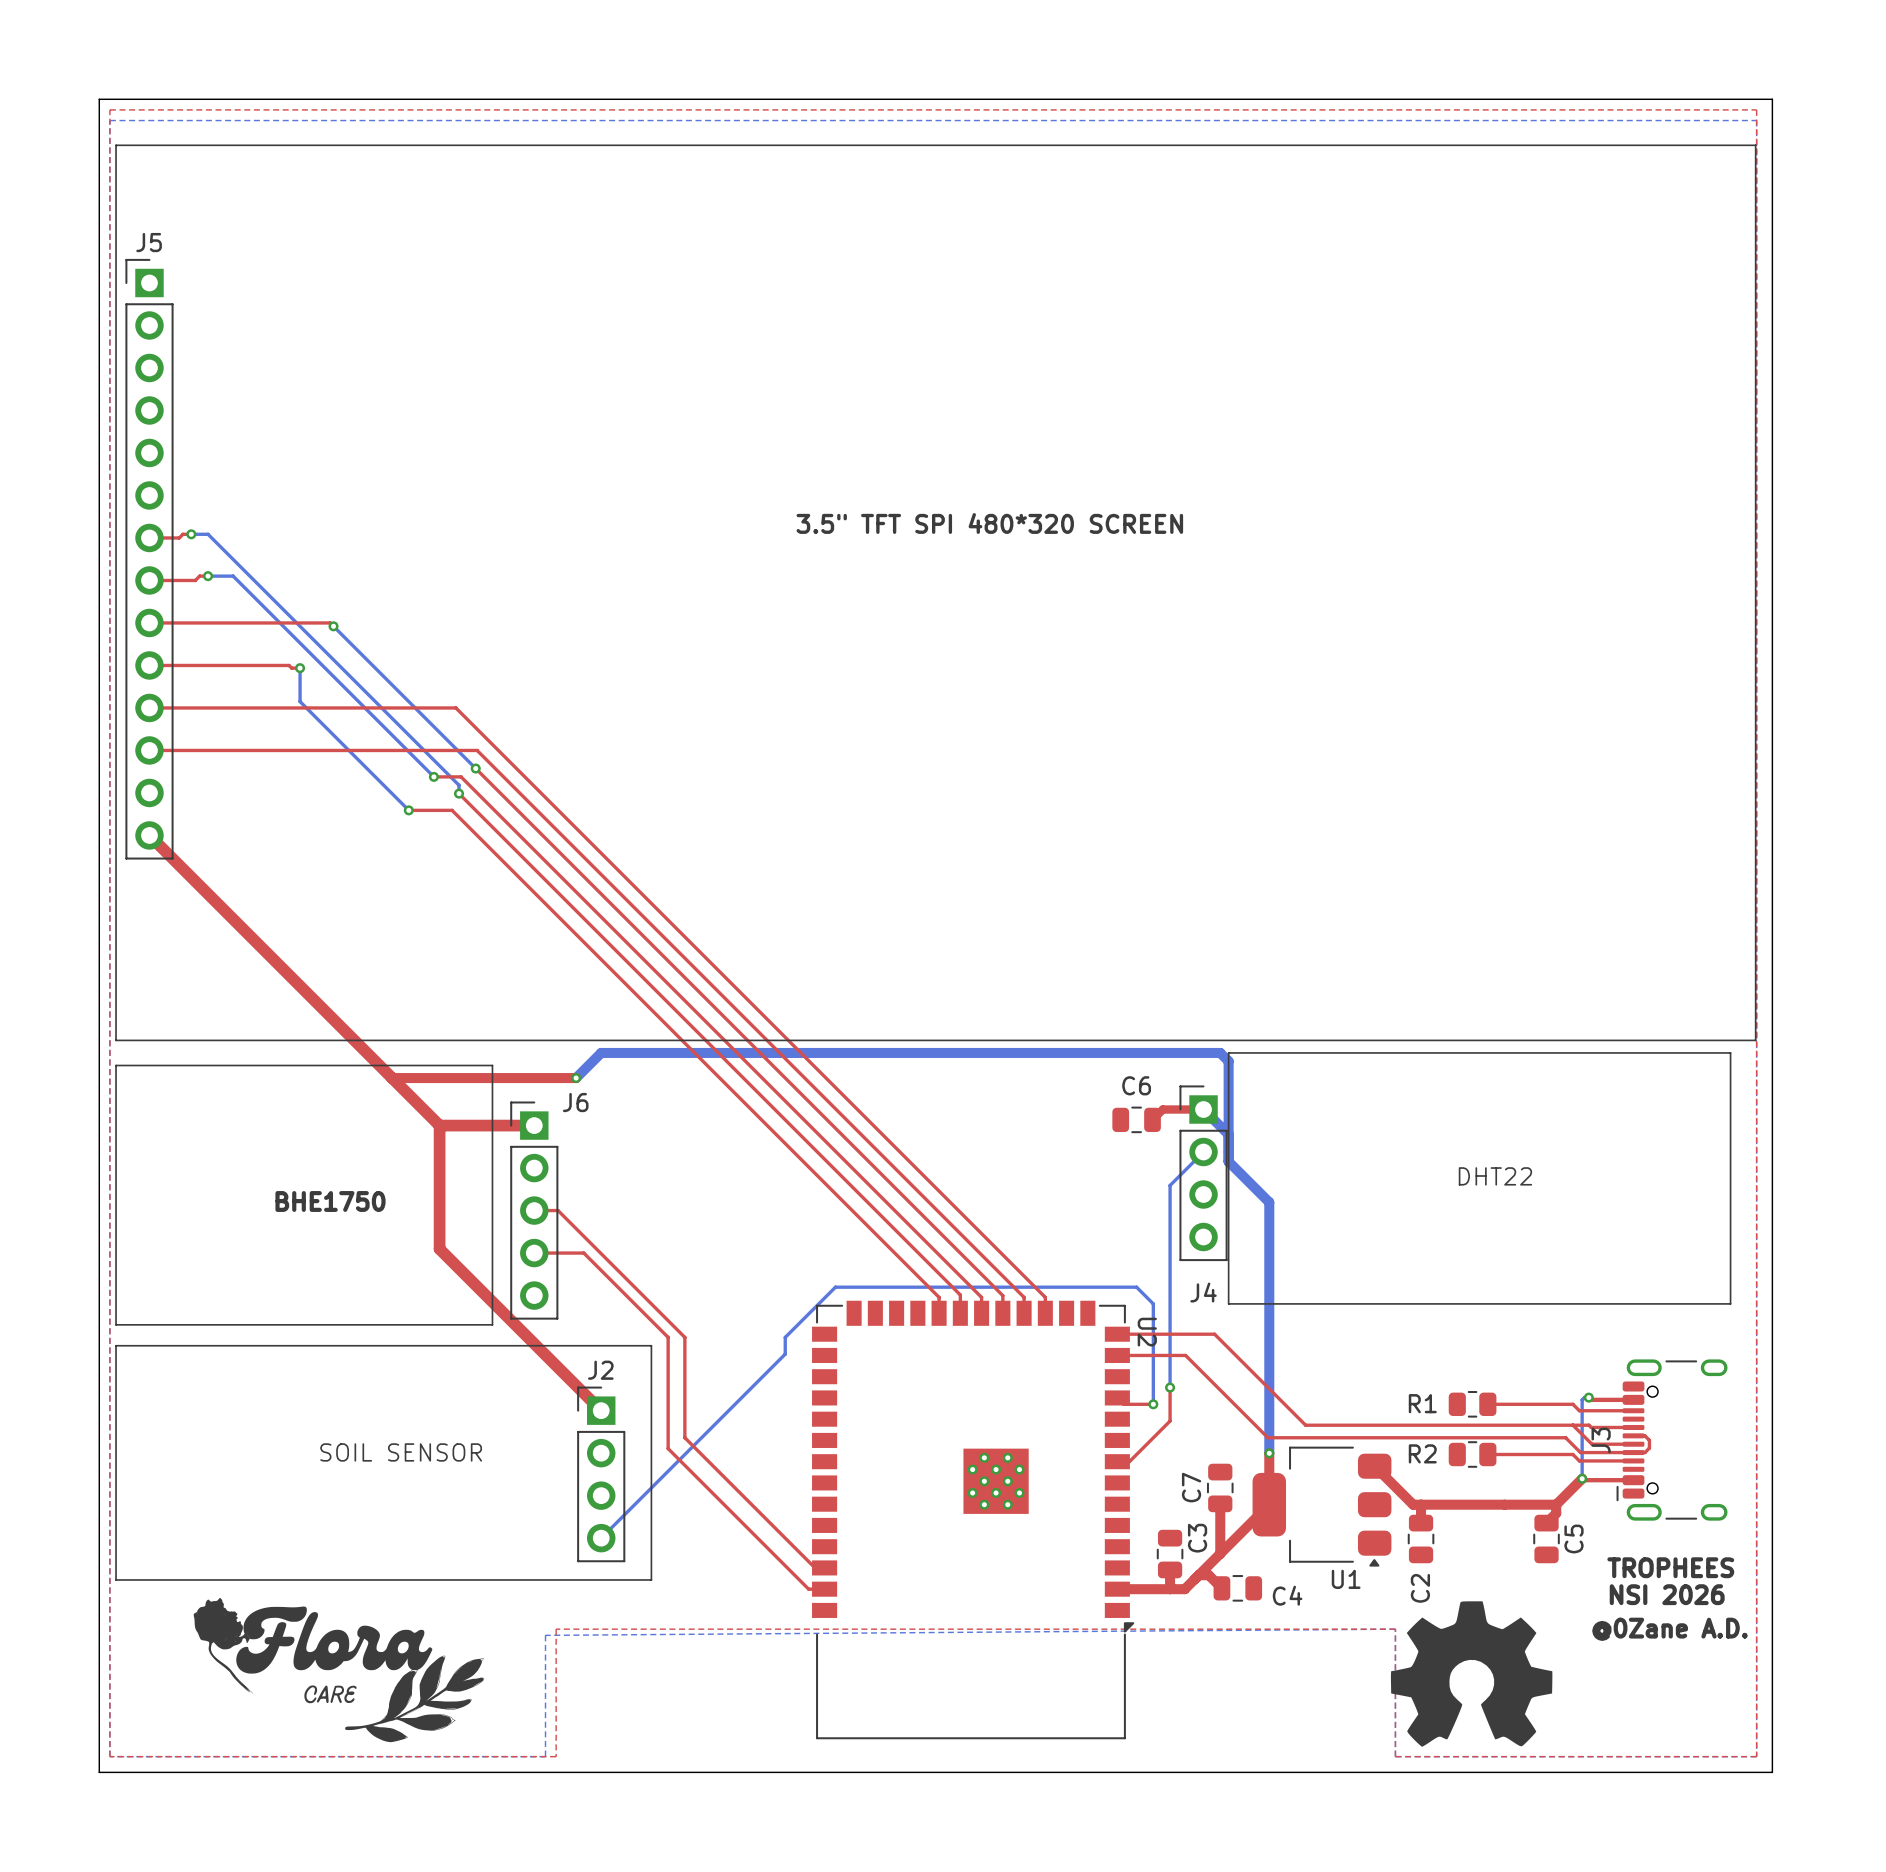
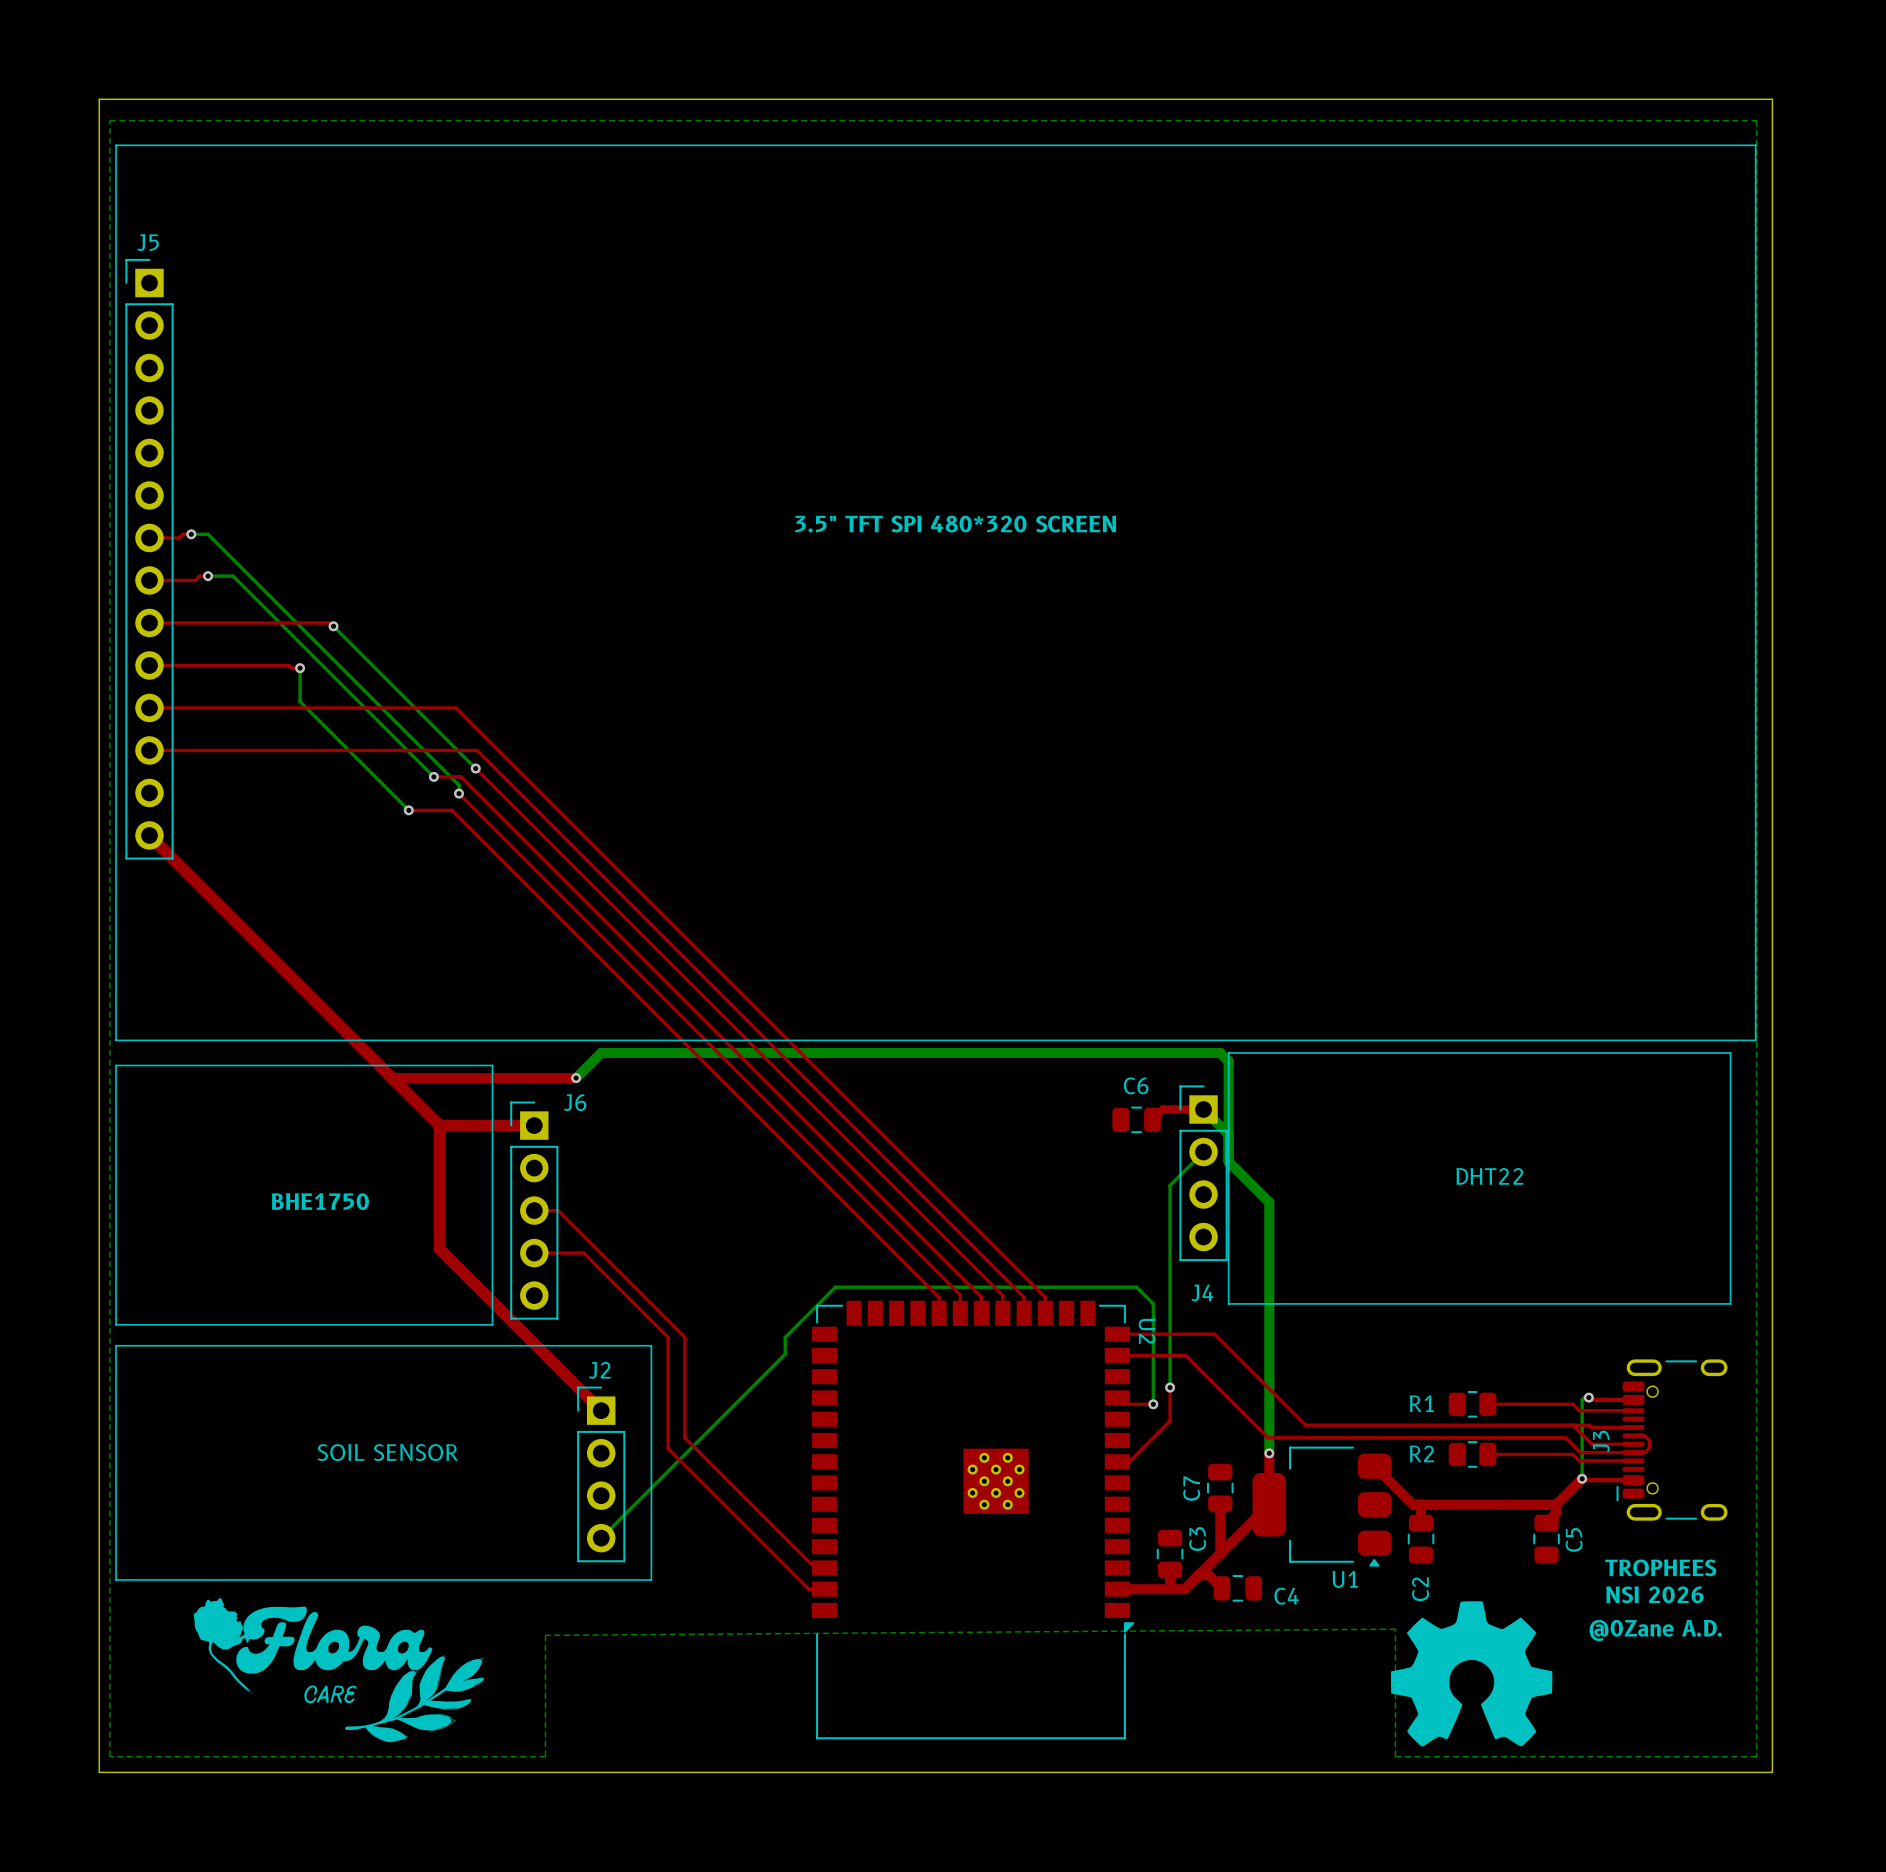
top zone outline: (109, 109) (1756, 109) (1756, 1756) (1395, 1756) (1395, 1629) (556, 1629) (556, 1756) (109, 1756) (109, 109) -> none

